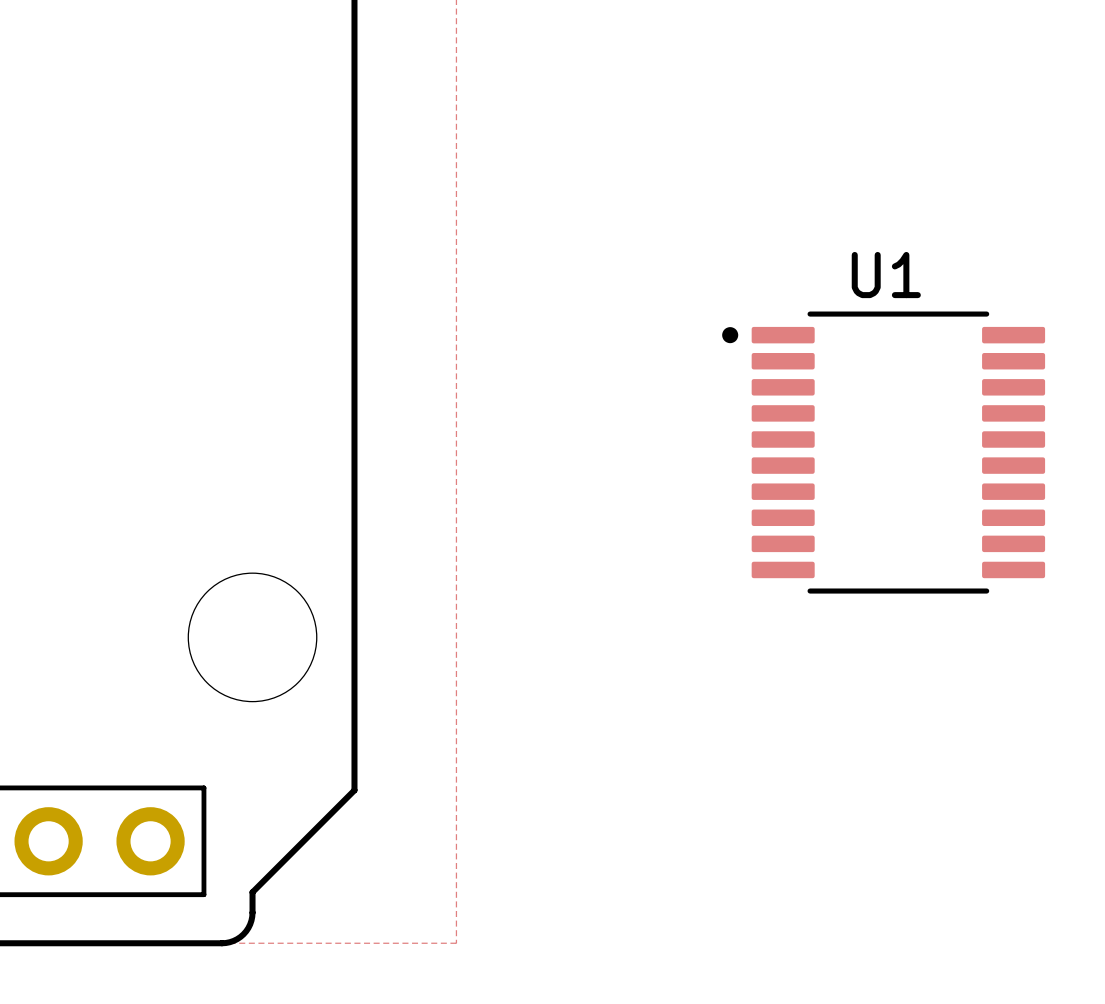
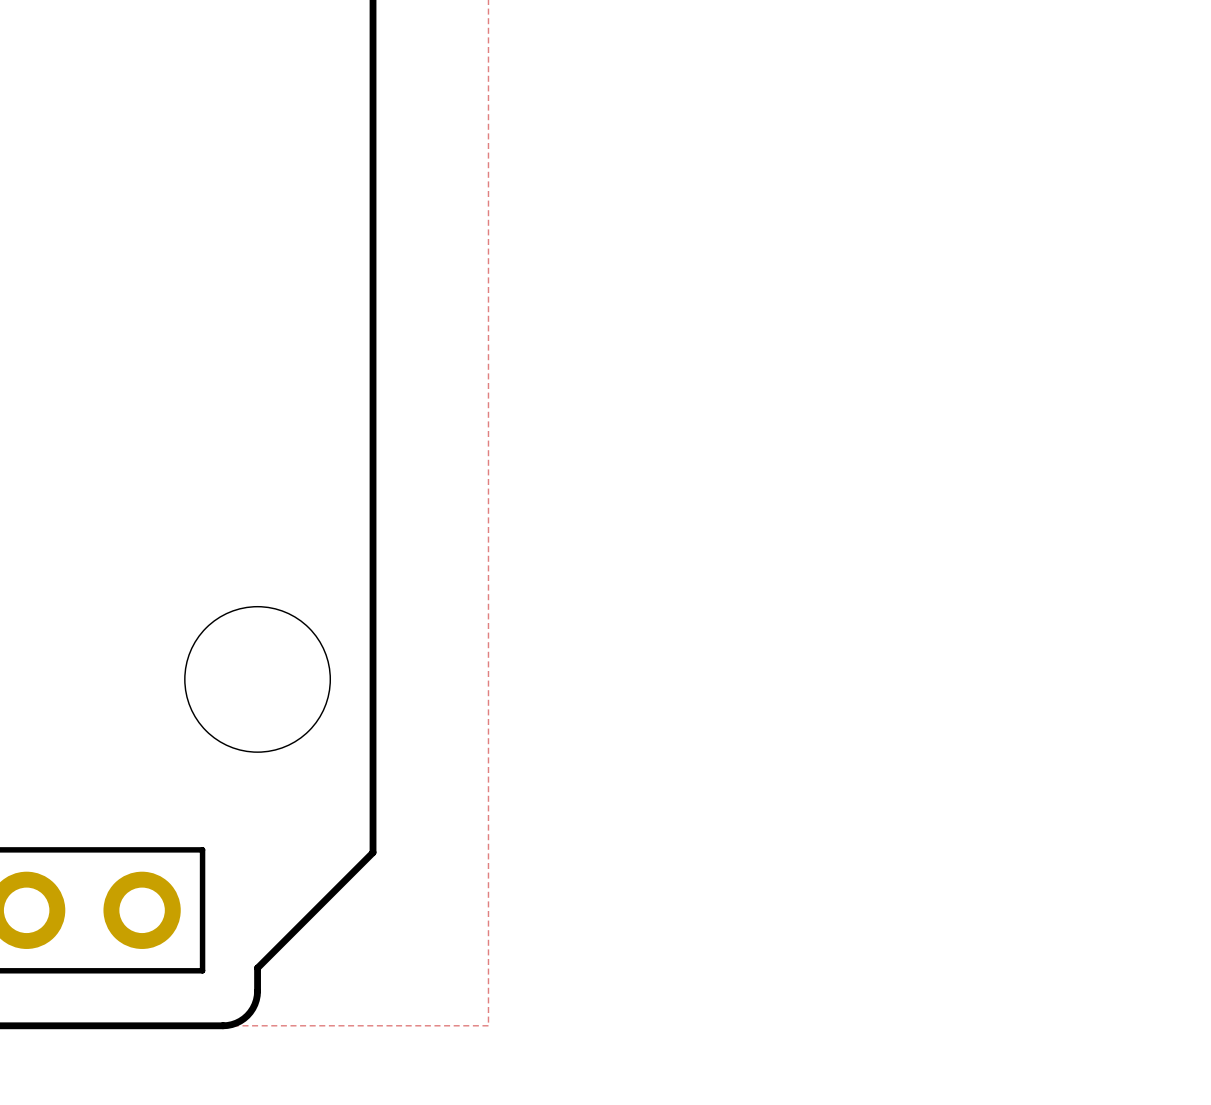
U1: (883, 452) -> none

